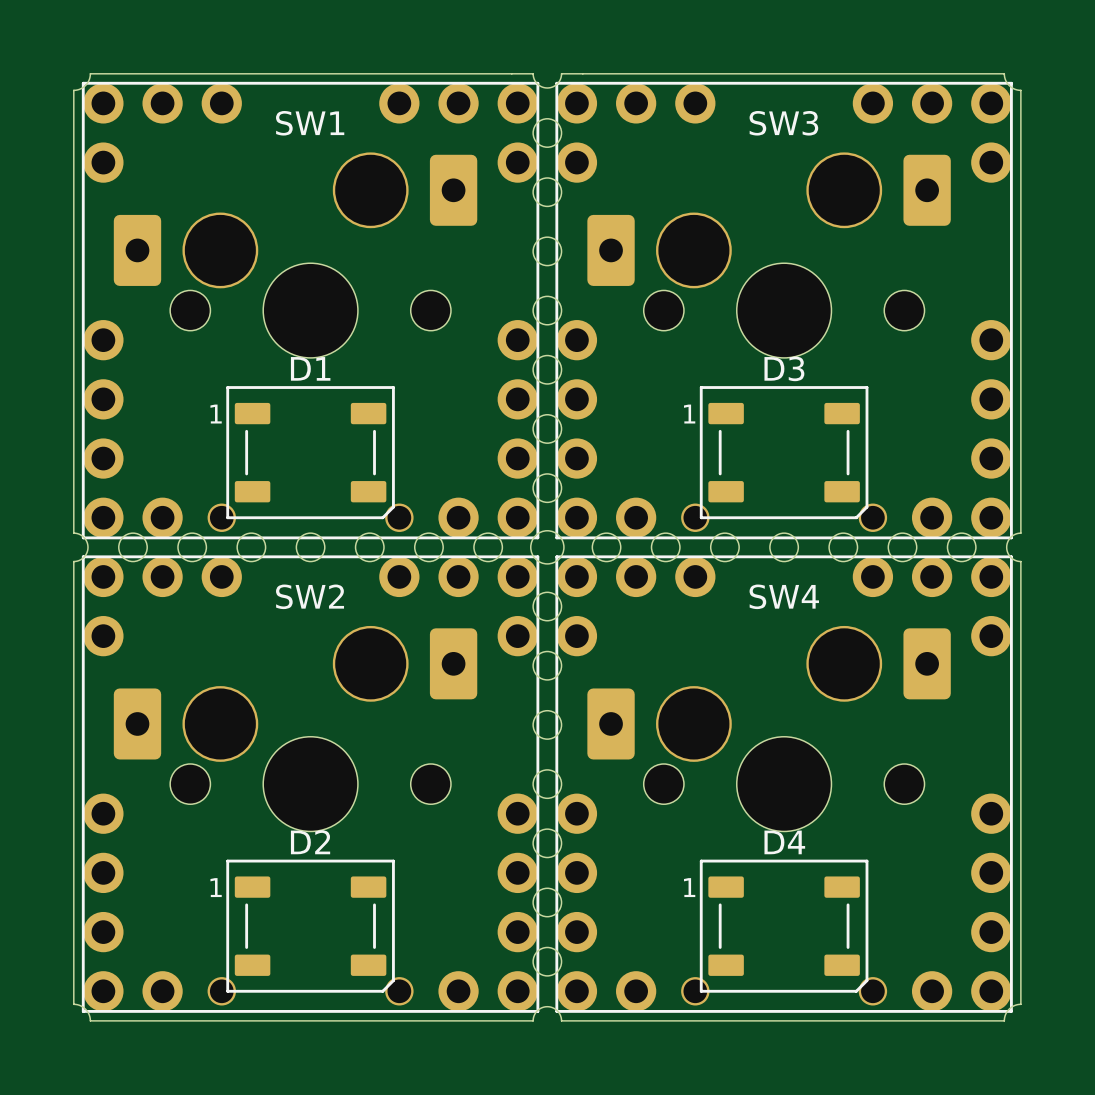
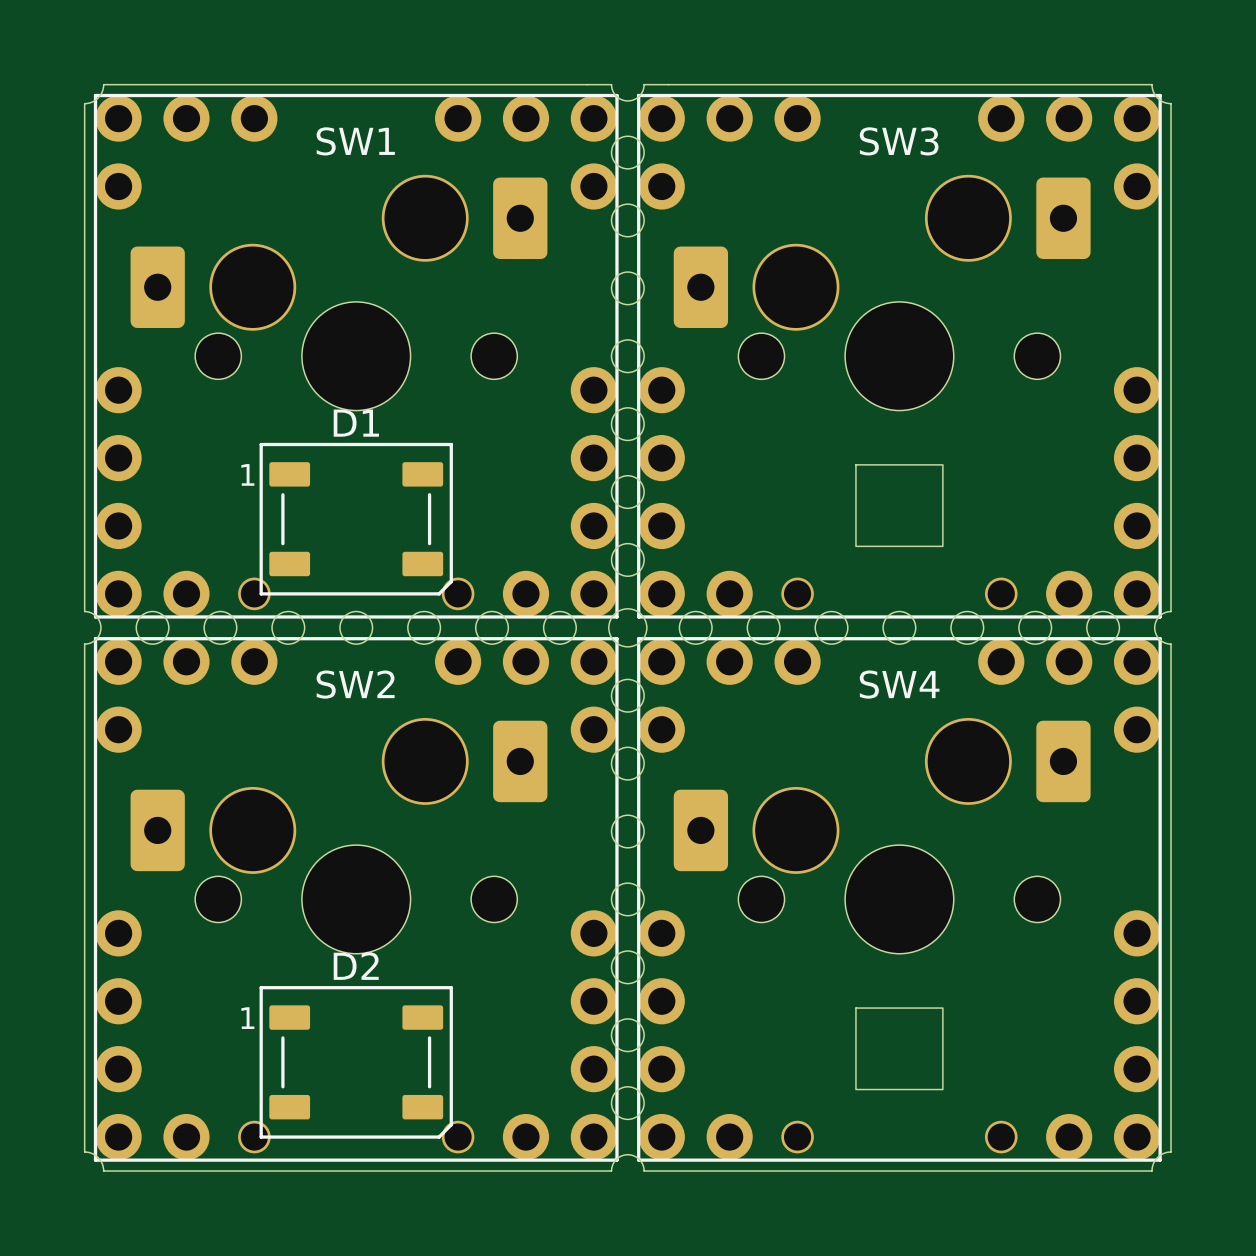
SW3 footprint: [555, 81, 1013, 540] -> [637, 93, 1162, 619]
D3: (784, 452) -> none
SW4 footprint: [555, 555, 1013, 1013] -> [637, 637, 1162, 1162]
D4: (784, 926) -> none

